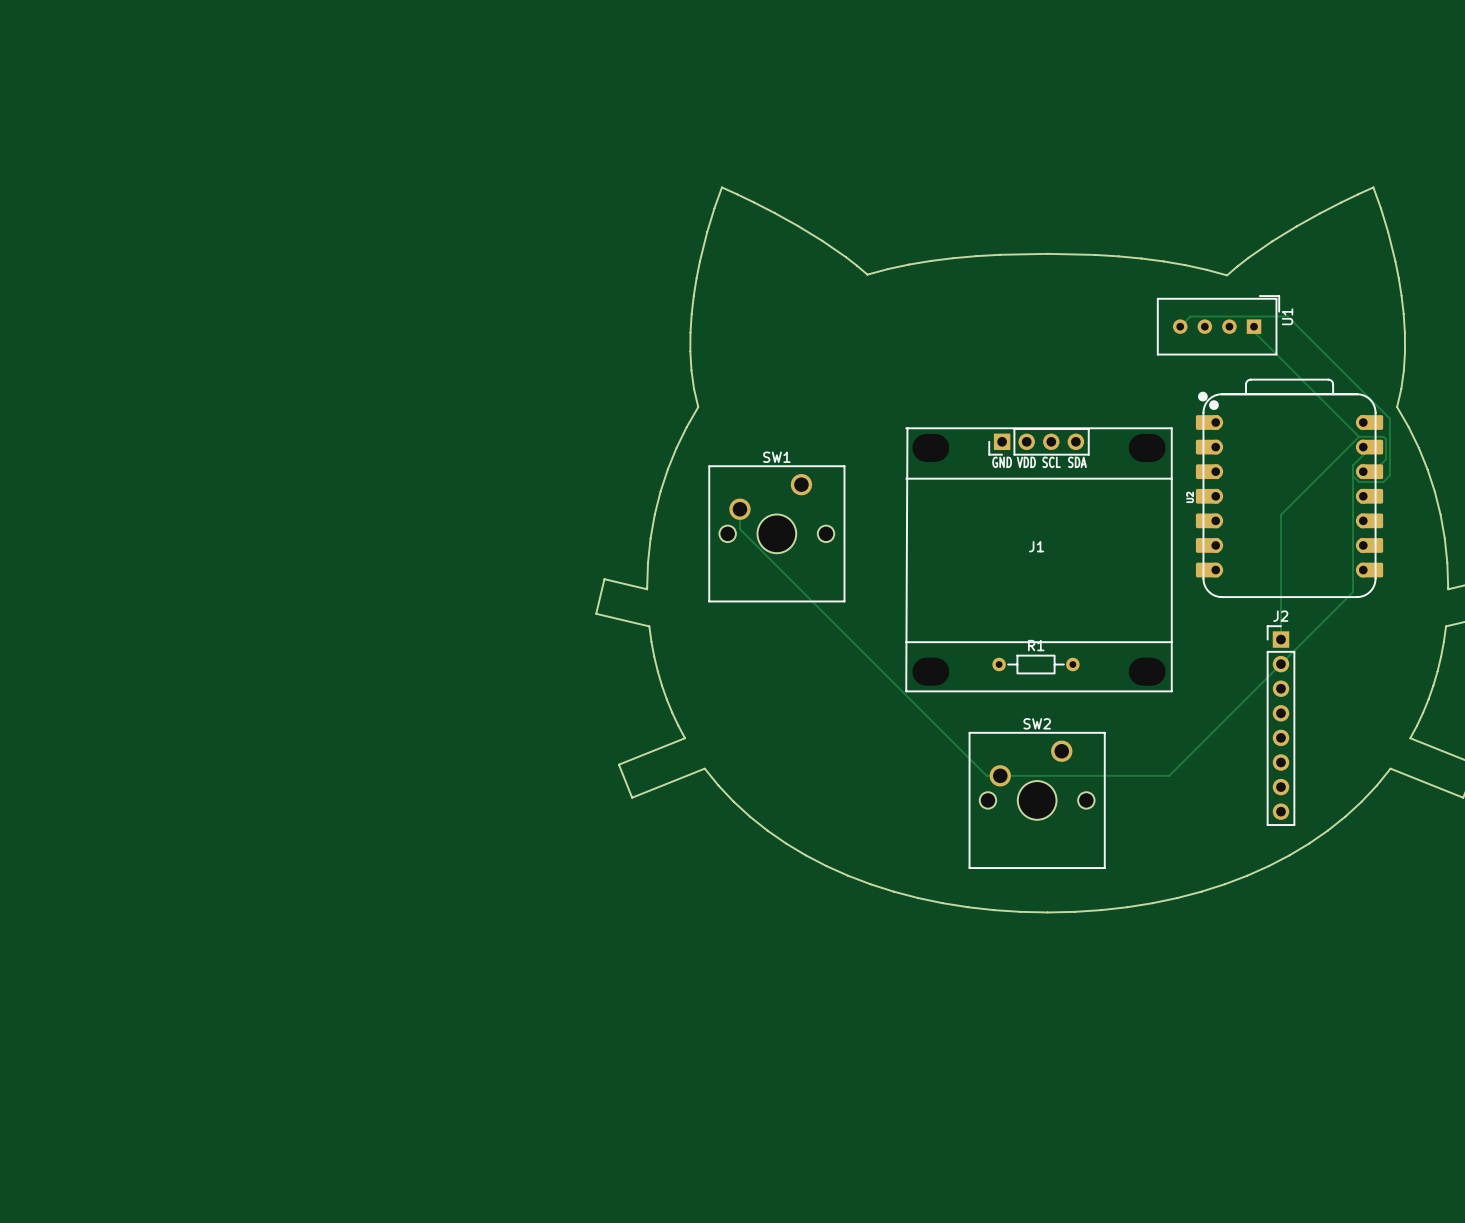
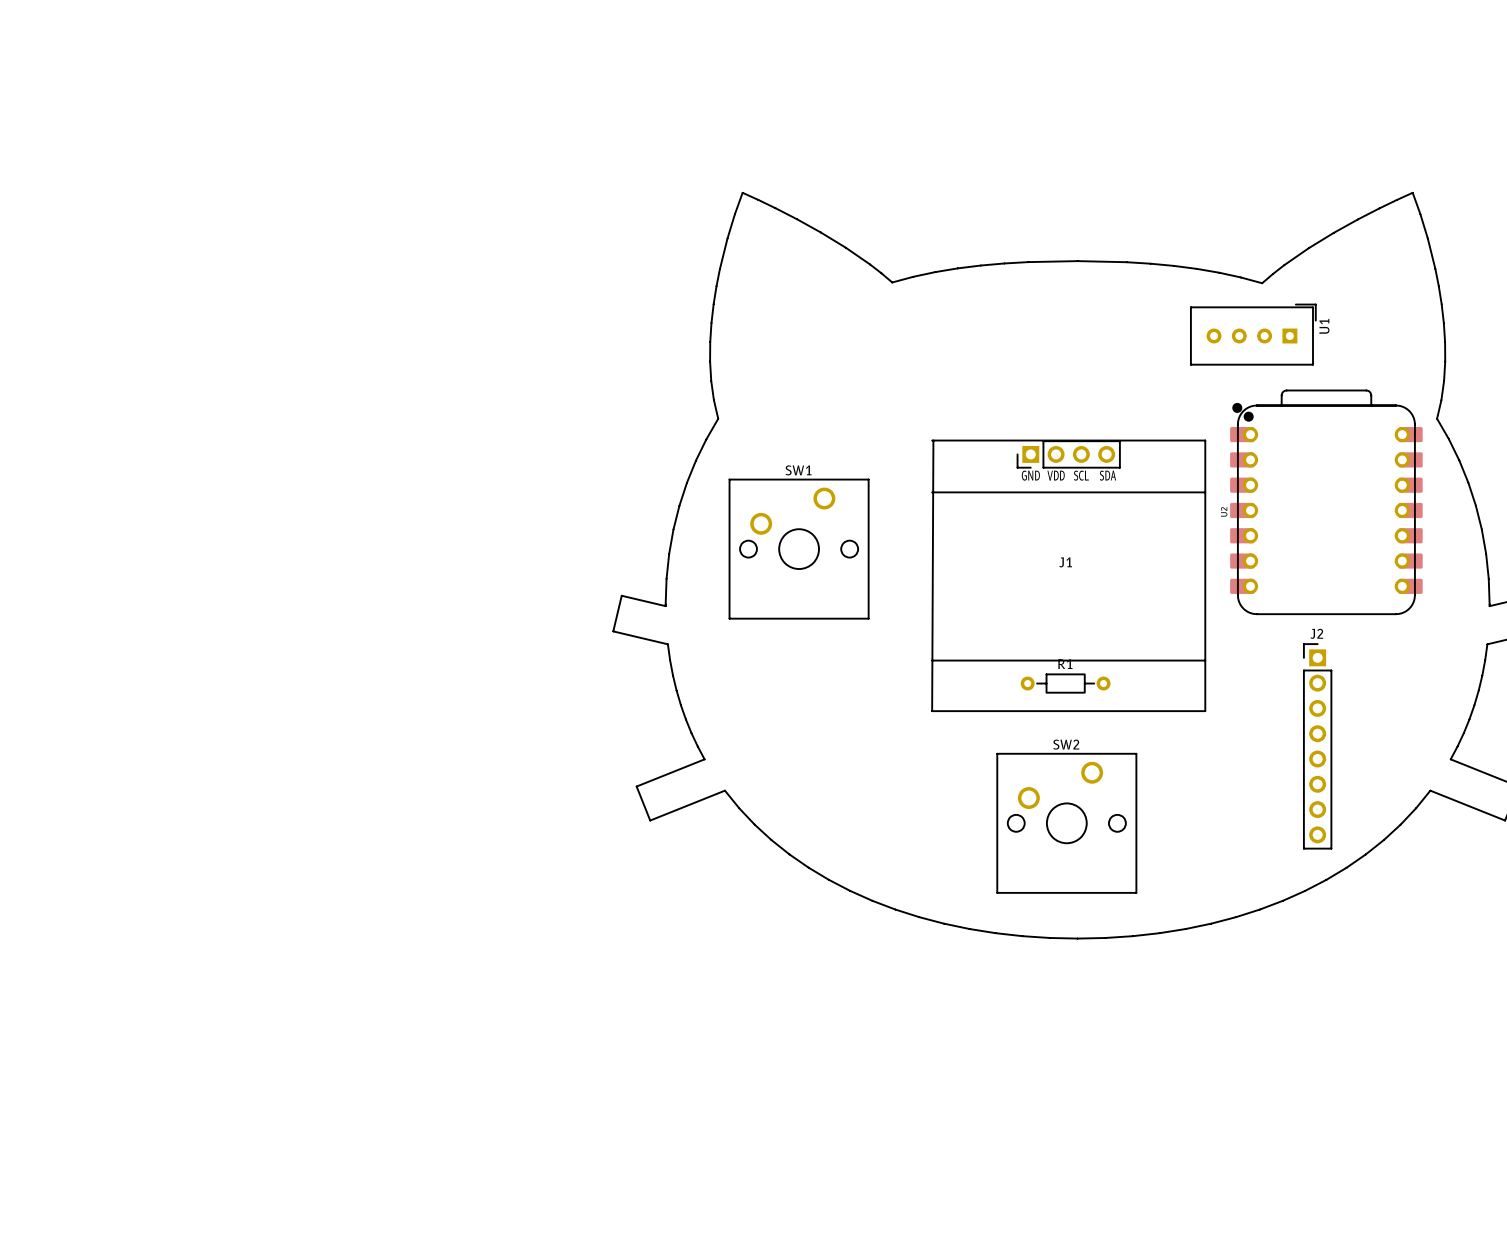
track: (1180, 326) (1190, 316) (1287, 316) (1389, 418) (1389, 475) (1383, 481) (1359, 481) (1353, 475) -> none
track: (1254, 326) (1254, 331) (1359, 436) -> none
track: (1359, 436) (1383, 436) (1386, 439) (1386, 459) (1373, 471) (1363, 471) -> none
track: (1359, 436) (1281, 514) (1281, 640) -> none
track: (1371, 447) (1353, 465) (1353, 592) (1169, 775) (986, 775) (739, 529) (739, 509) -> none

